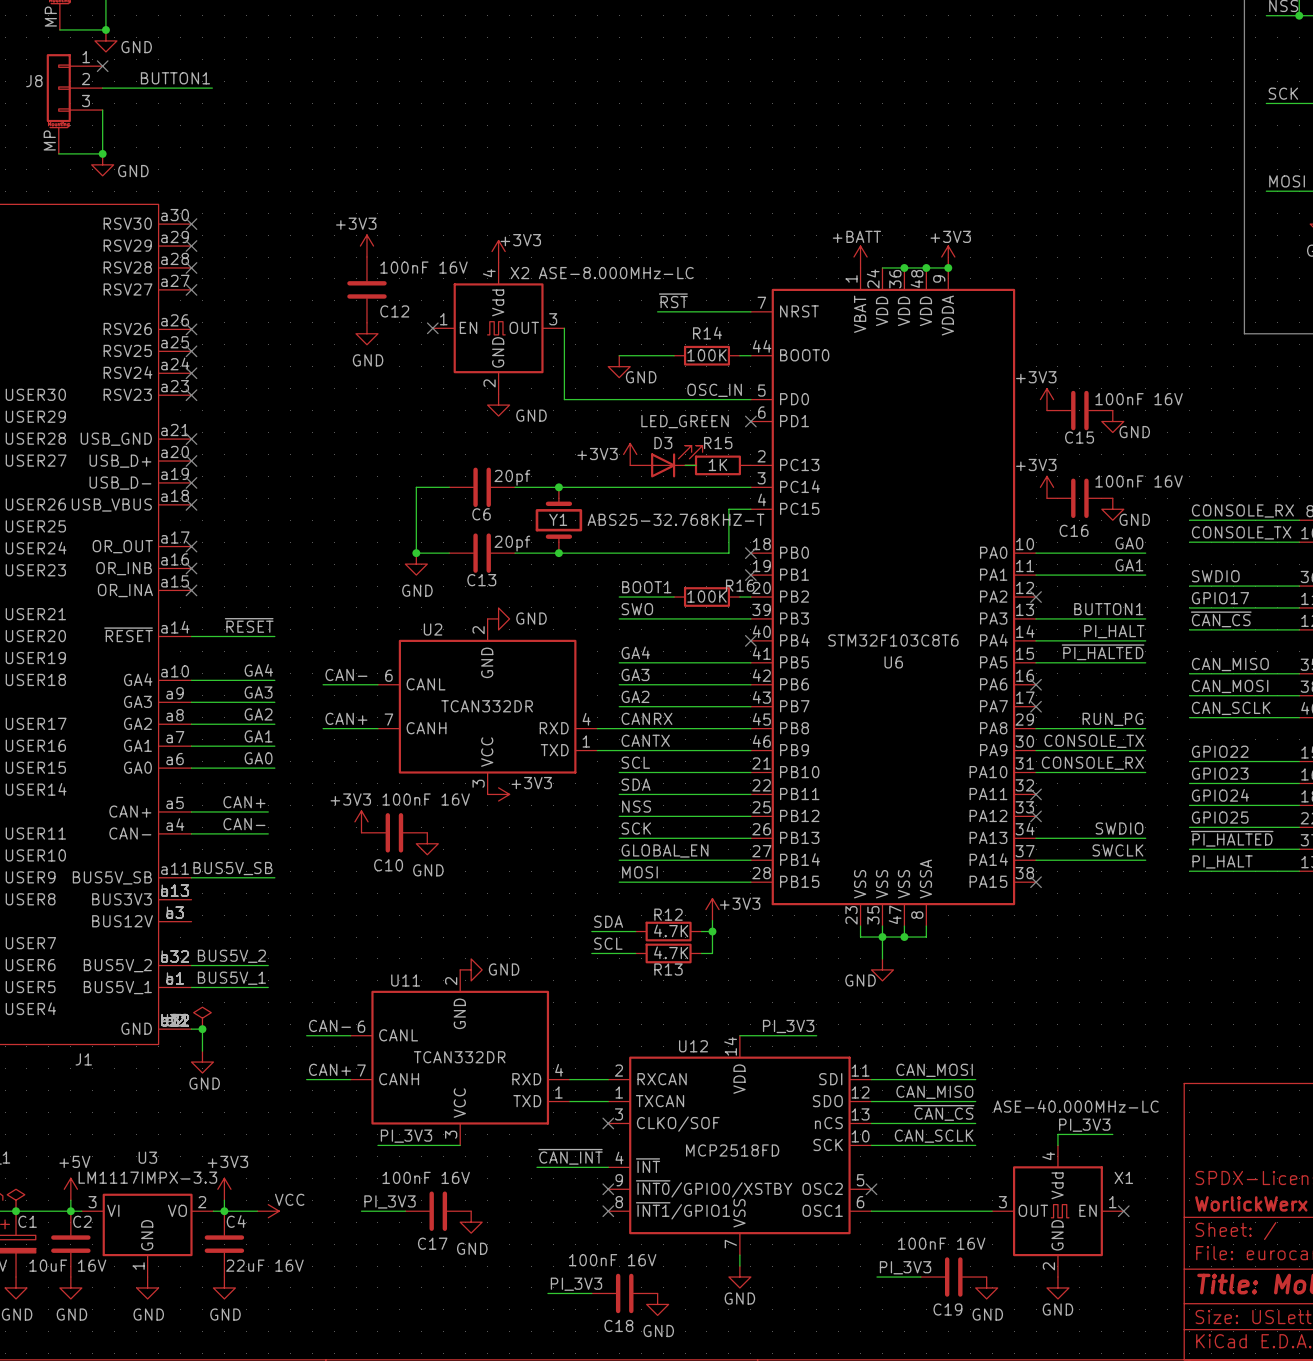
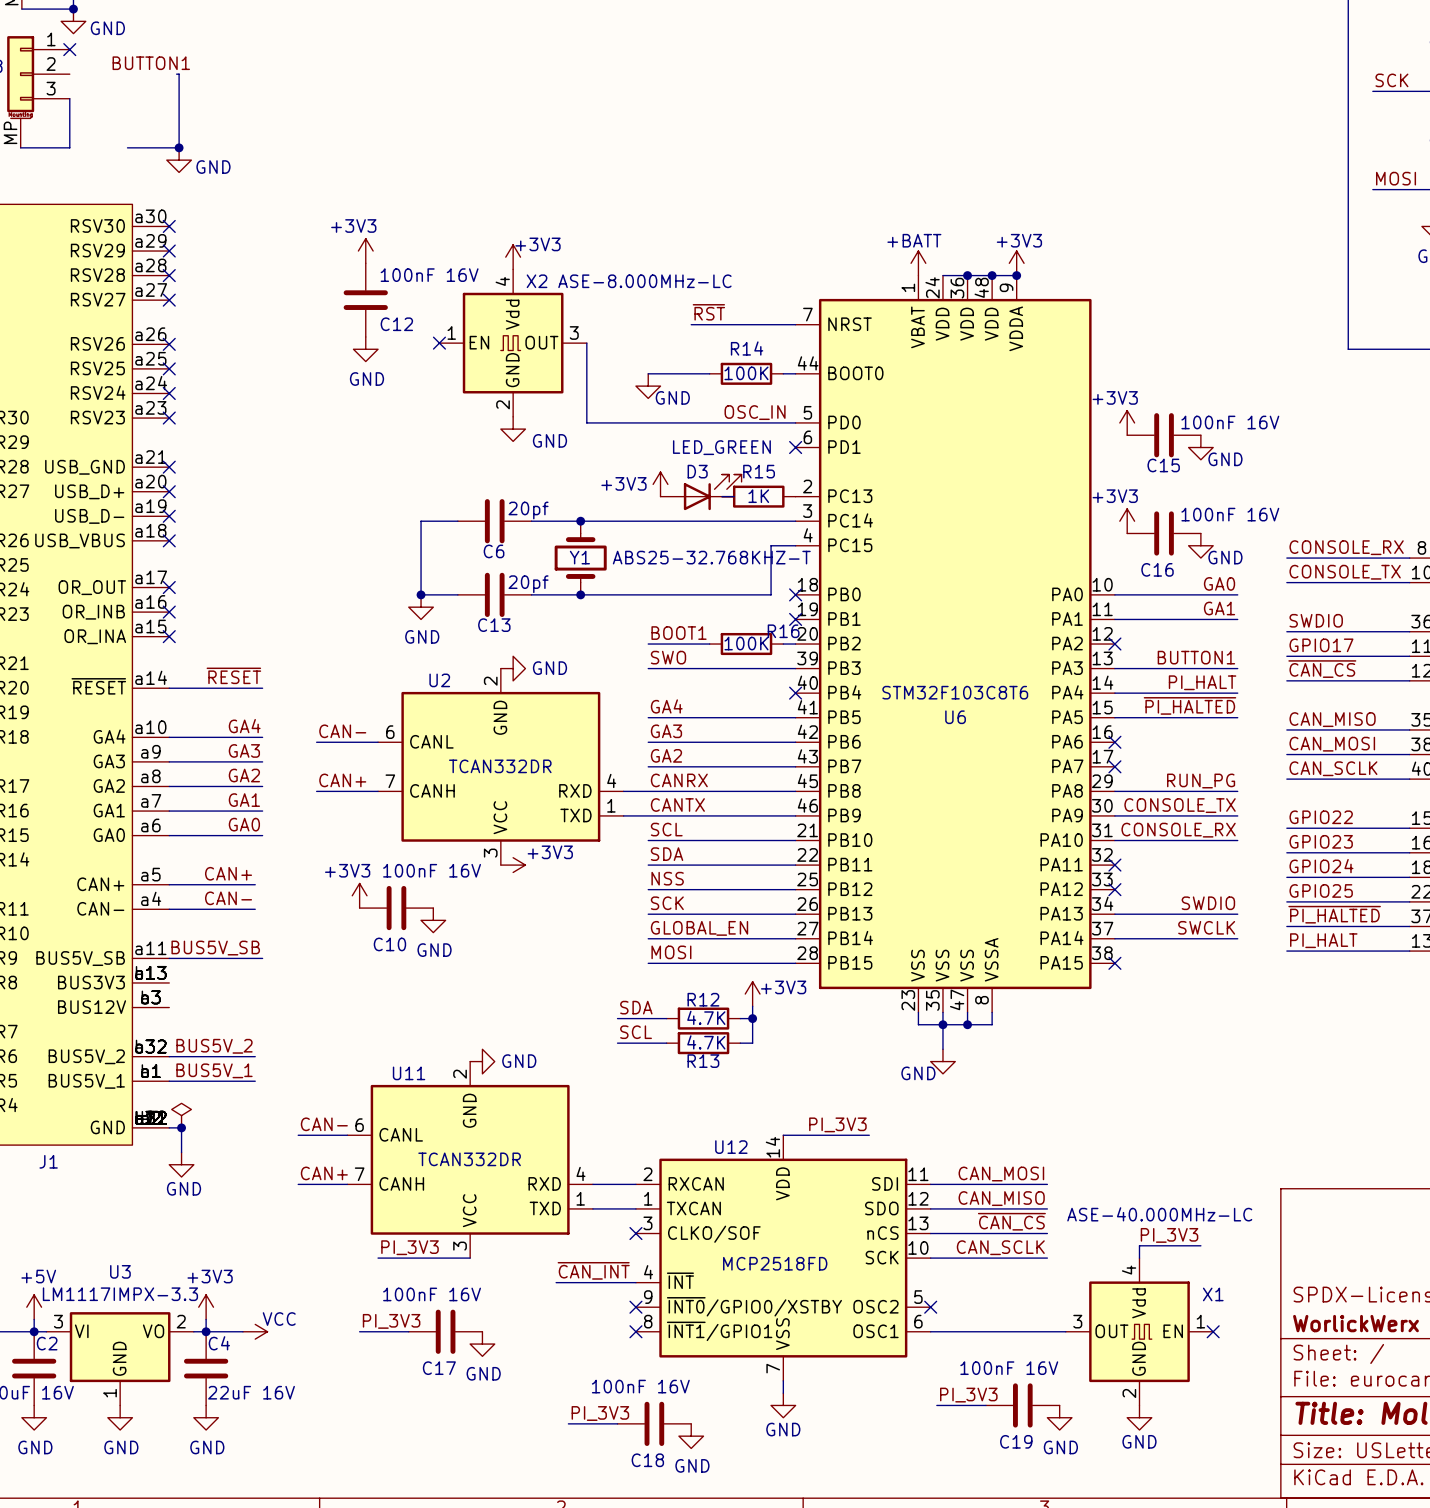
wire: (102, 88) (198, 88) -> none
wire: (200, 88) (212, 88) -> (179, 74) (179, 147) (127, 147)
junction: (102, 153) -> none
junction: none -> (179, 147)
power symbol position: GND (102, 164) -> GND (179, 160)

